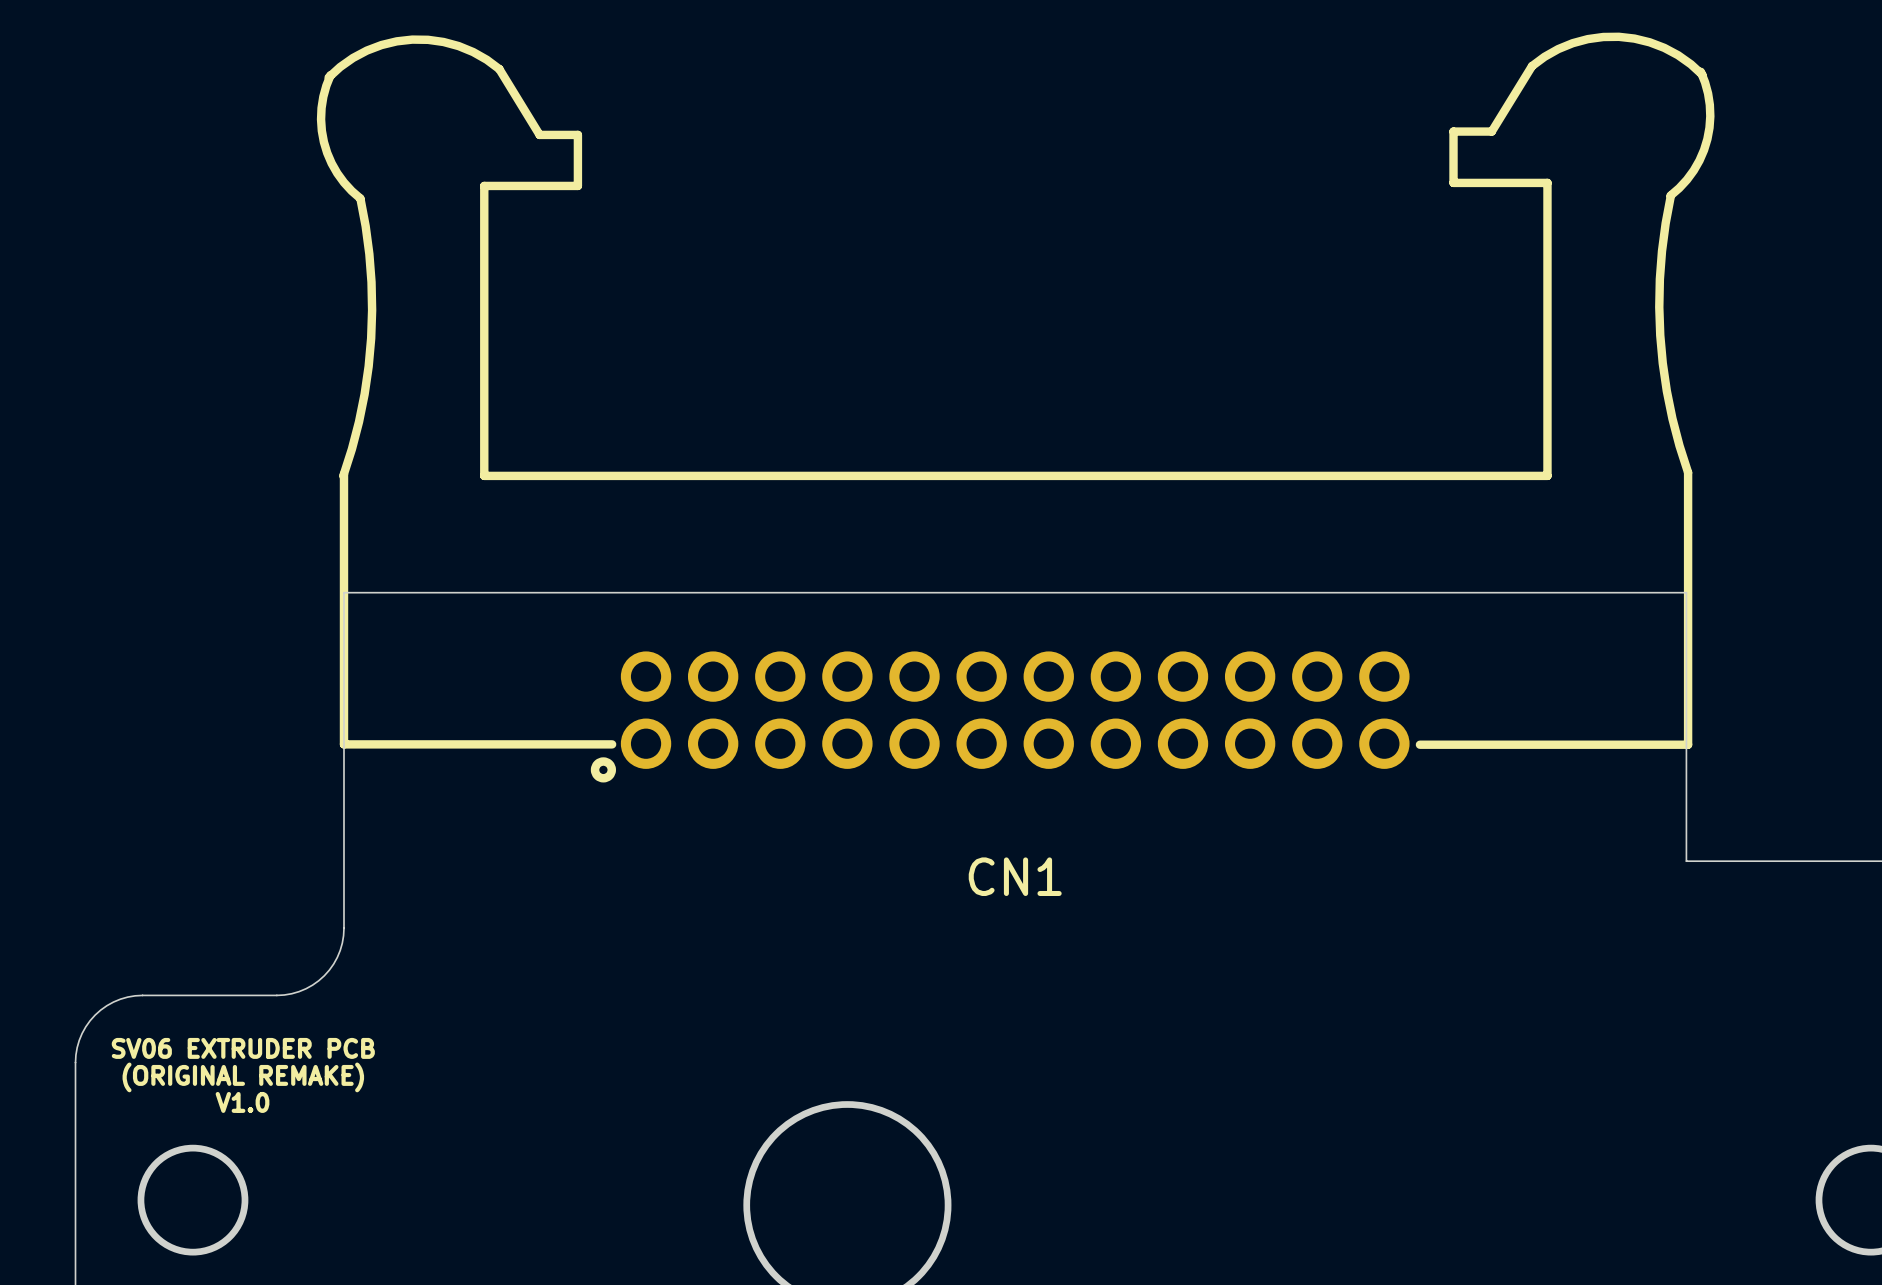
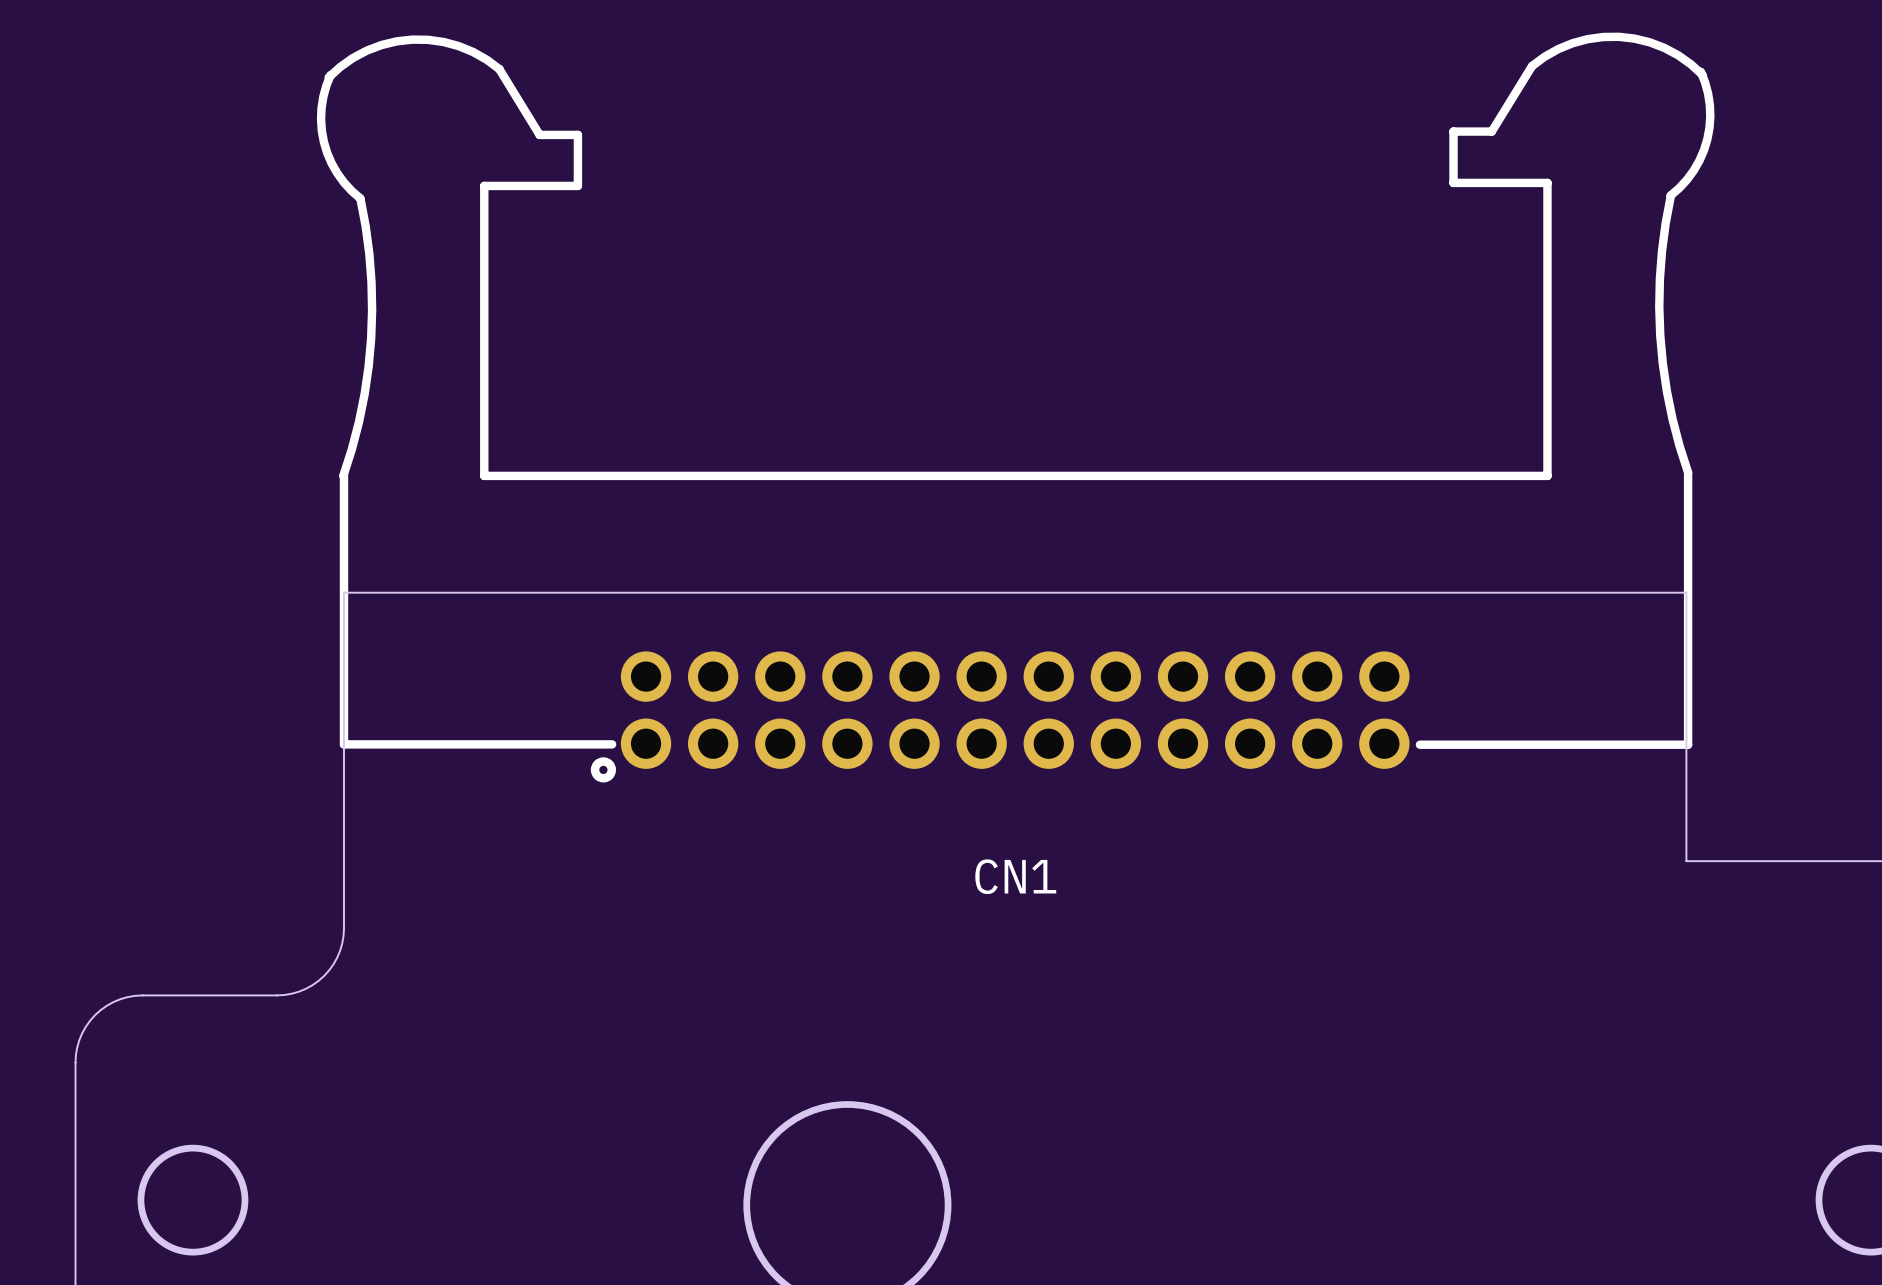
text: SV06 EXTRUDER PCB (243, 1048) -> none
text: (ORIGINAL REMAKE) (243, 1077) -> none
text: V1.0 (242, 1102) -> none

